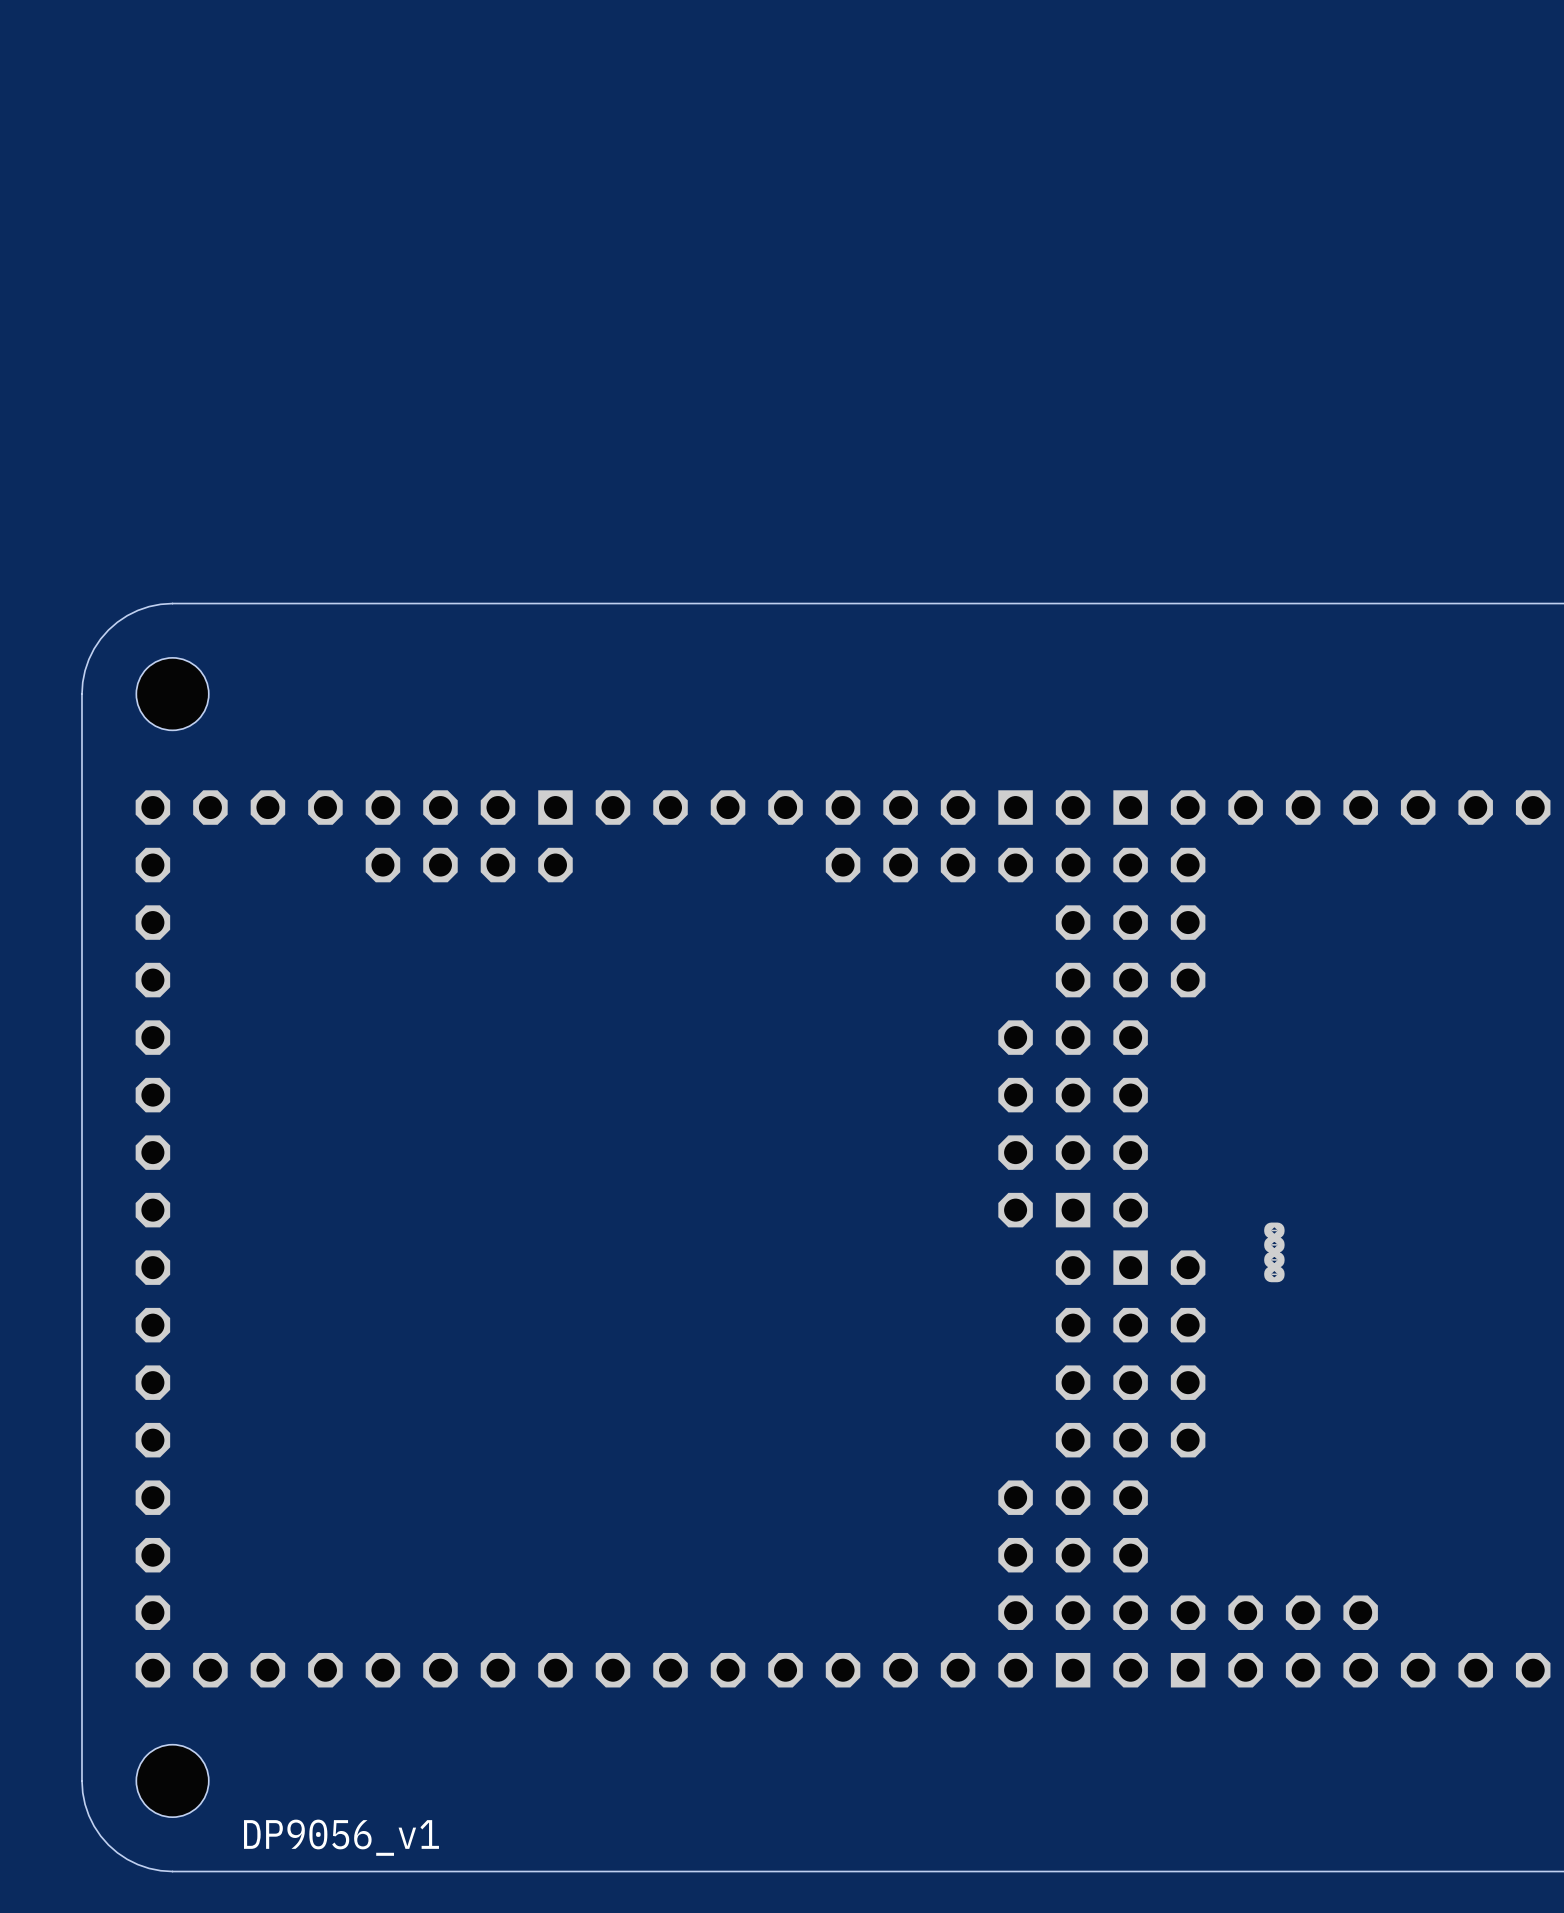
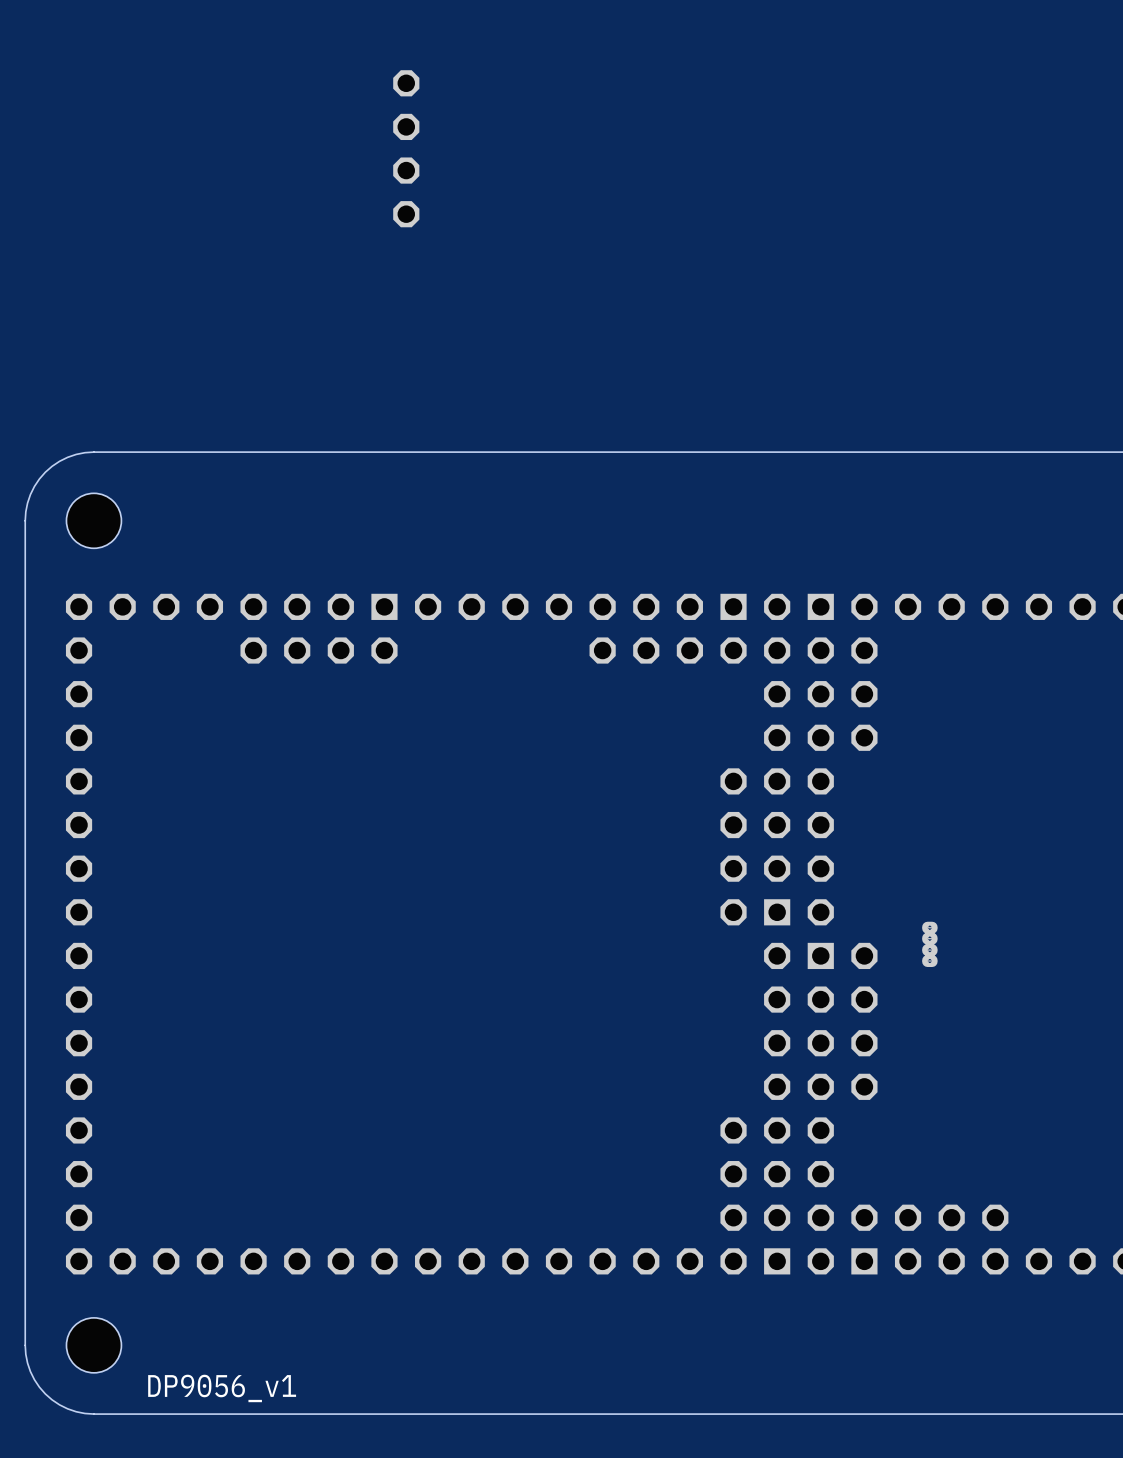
part: none -> (406, 148)

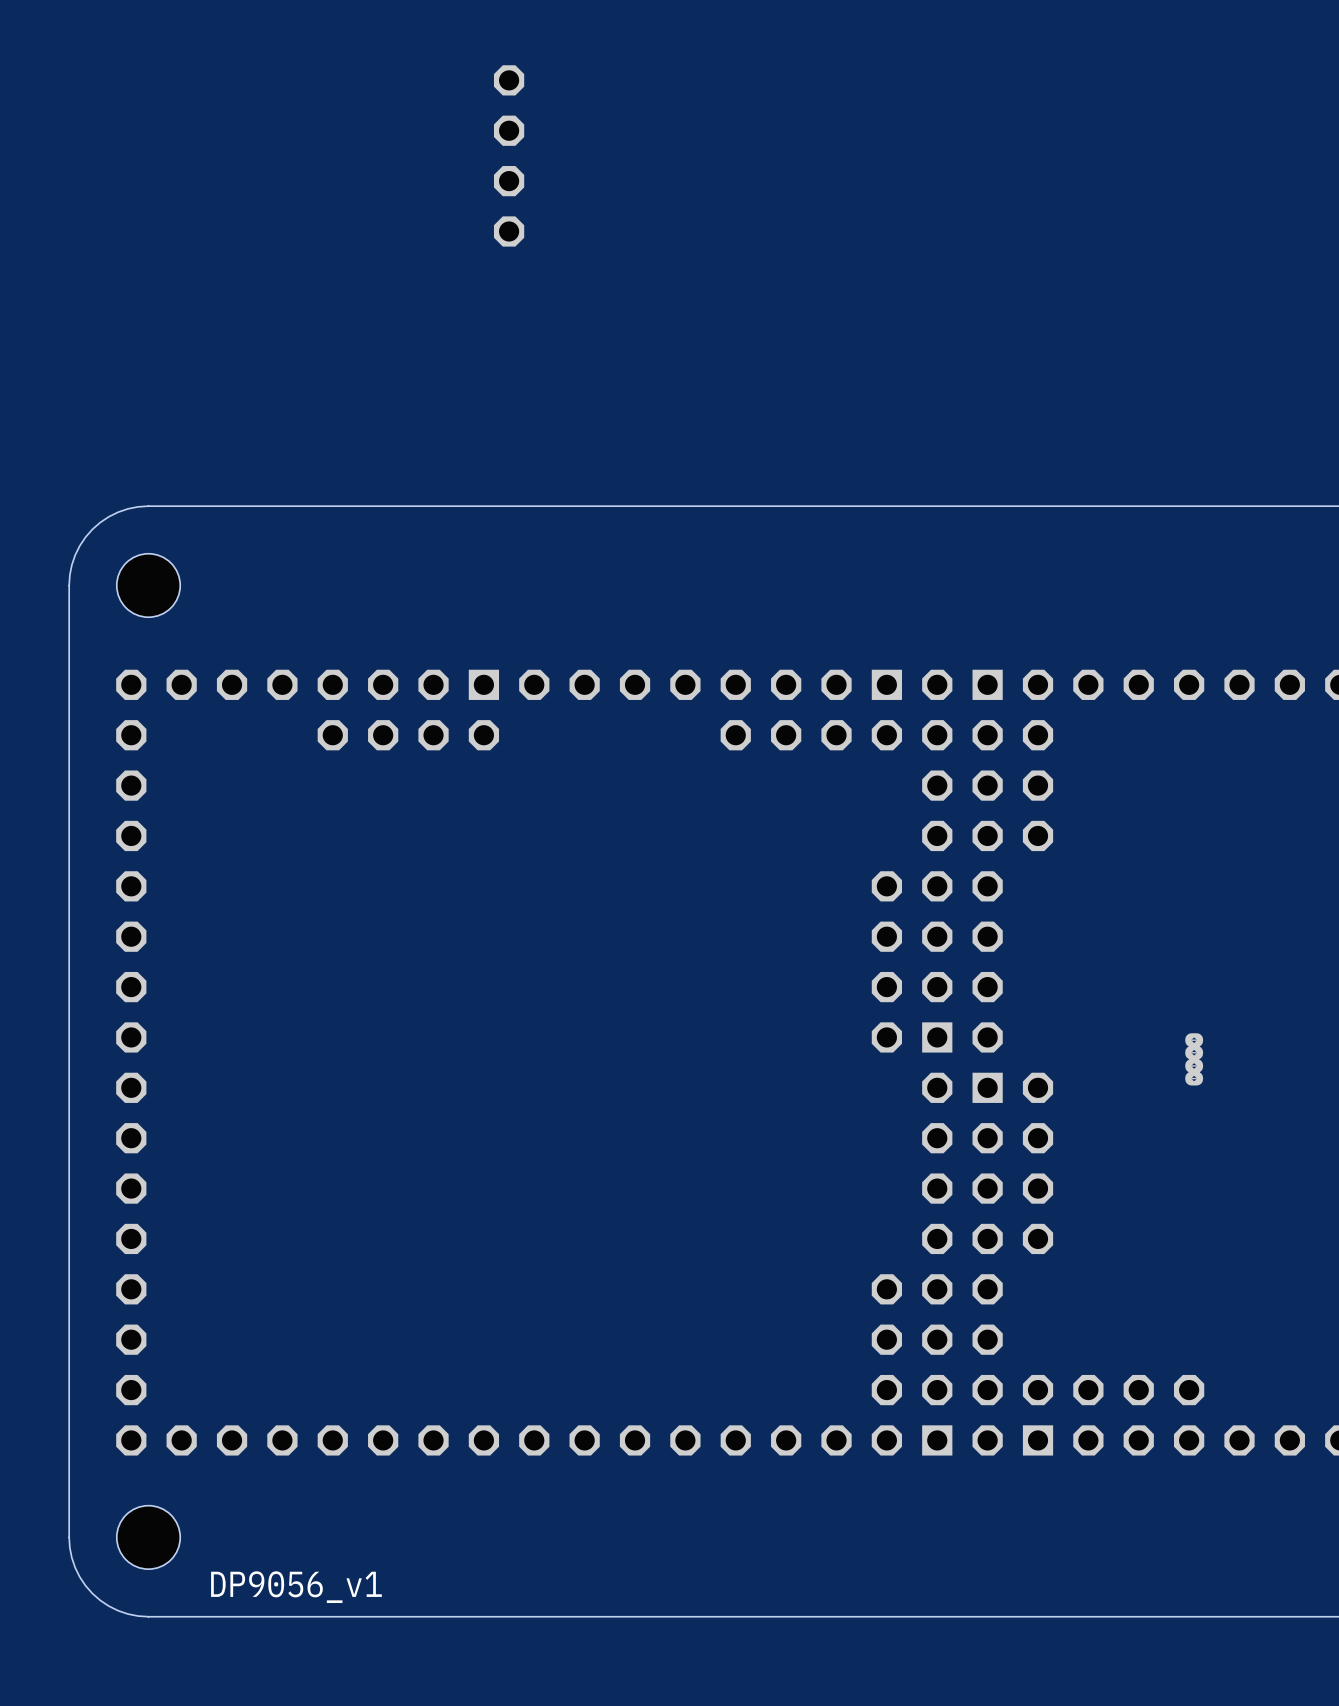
part: none -> (1194, 1053)
part: none -> (1194, 1065)
part: (929, 938) -> none
part: (929, 949) -> none

